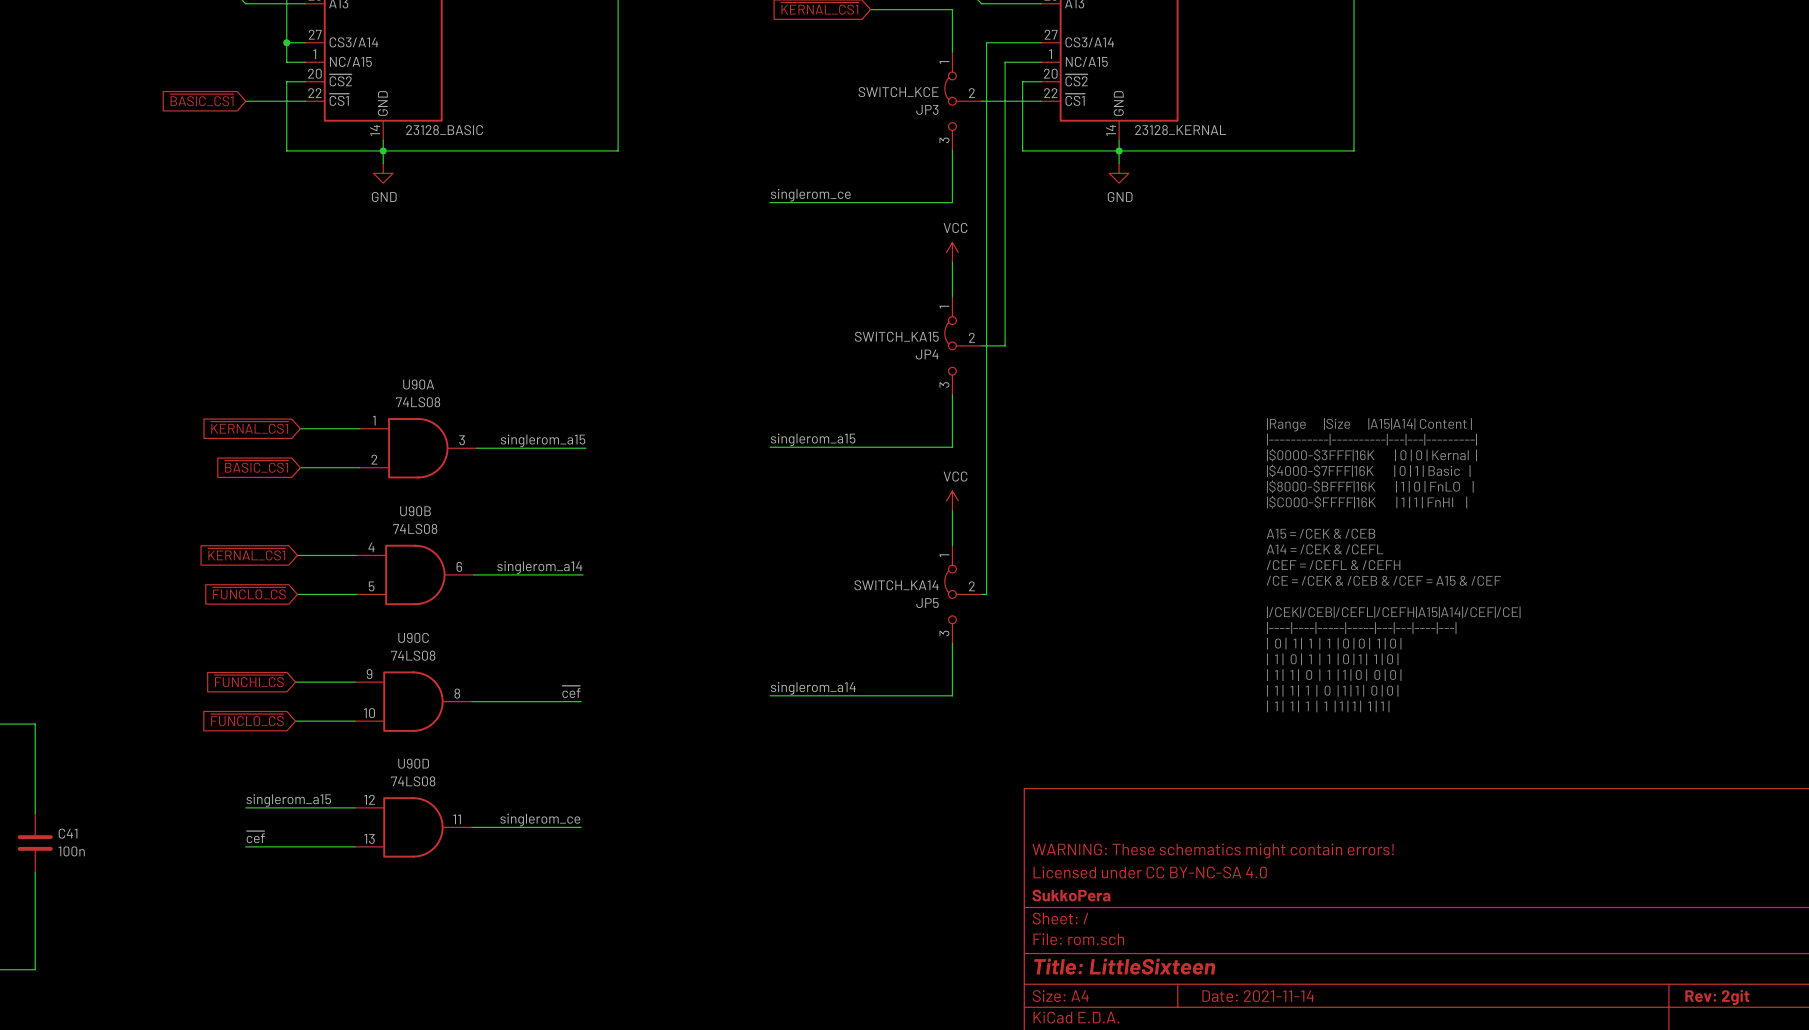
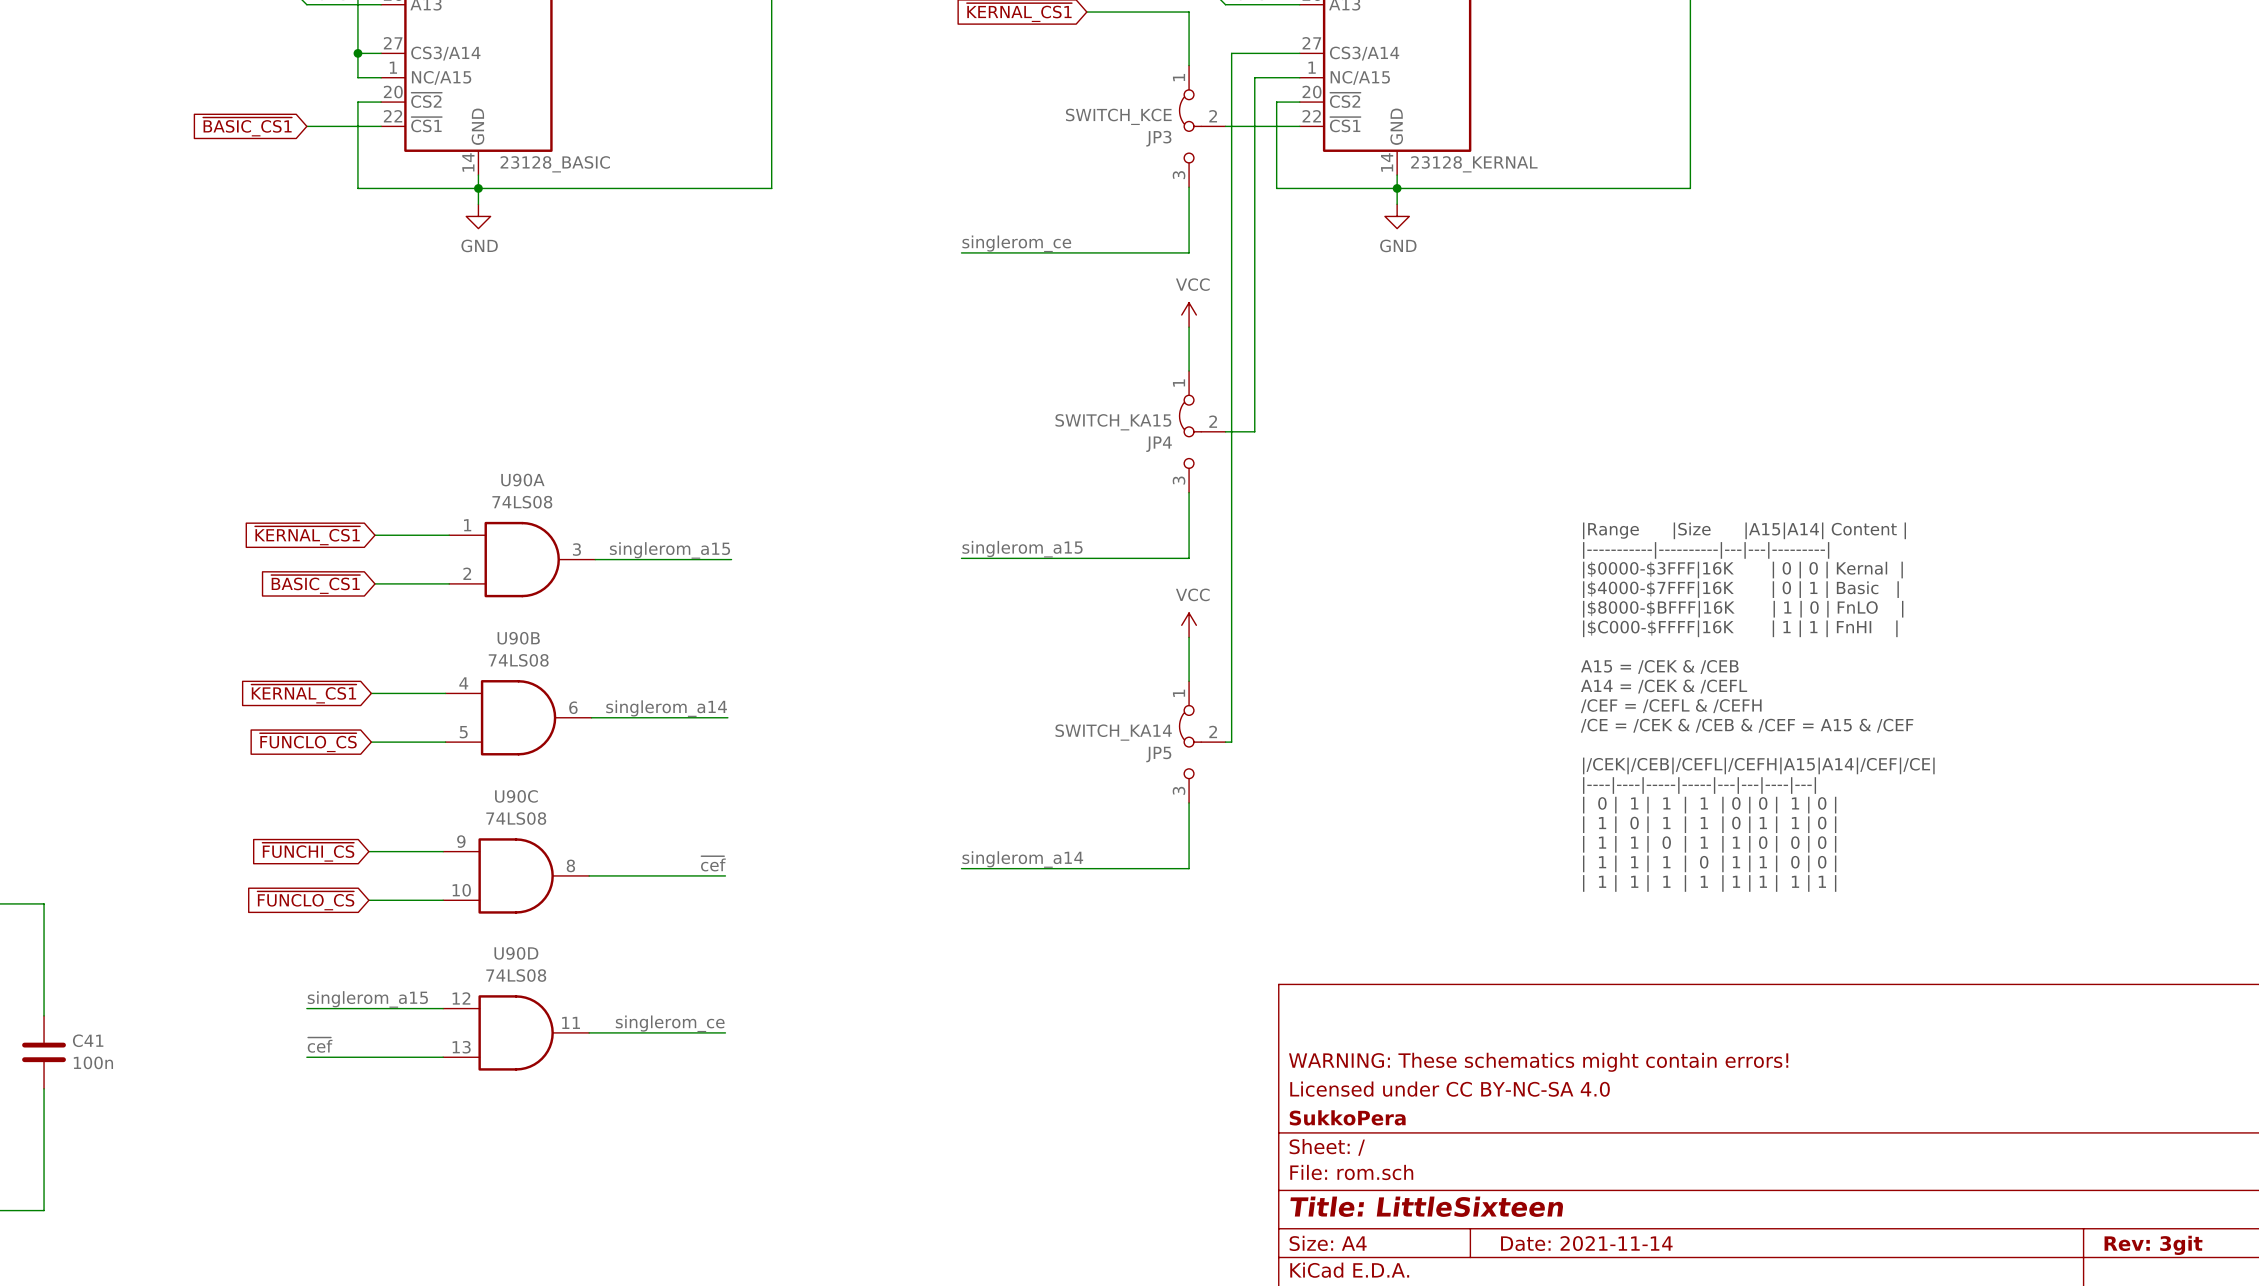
title block: Rev: 2git (1717, 997) -> Rev: 3git (2153, 1245)

